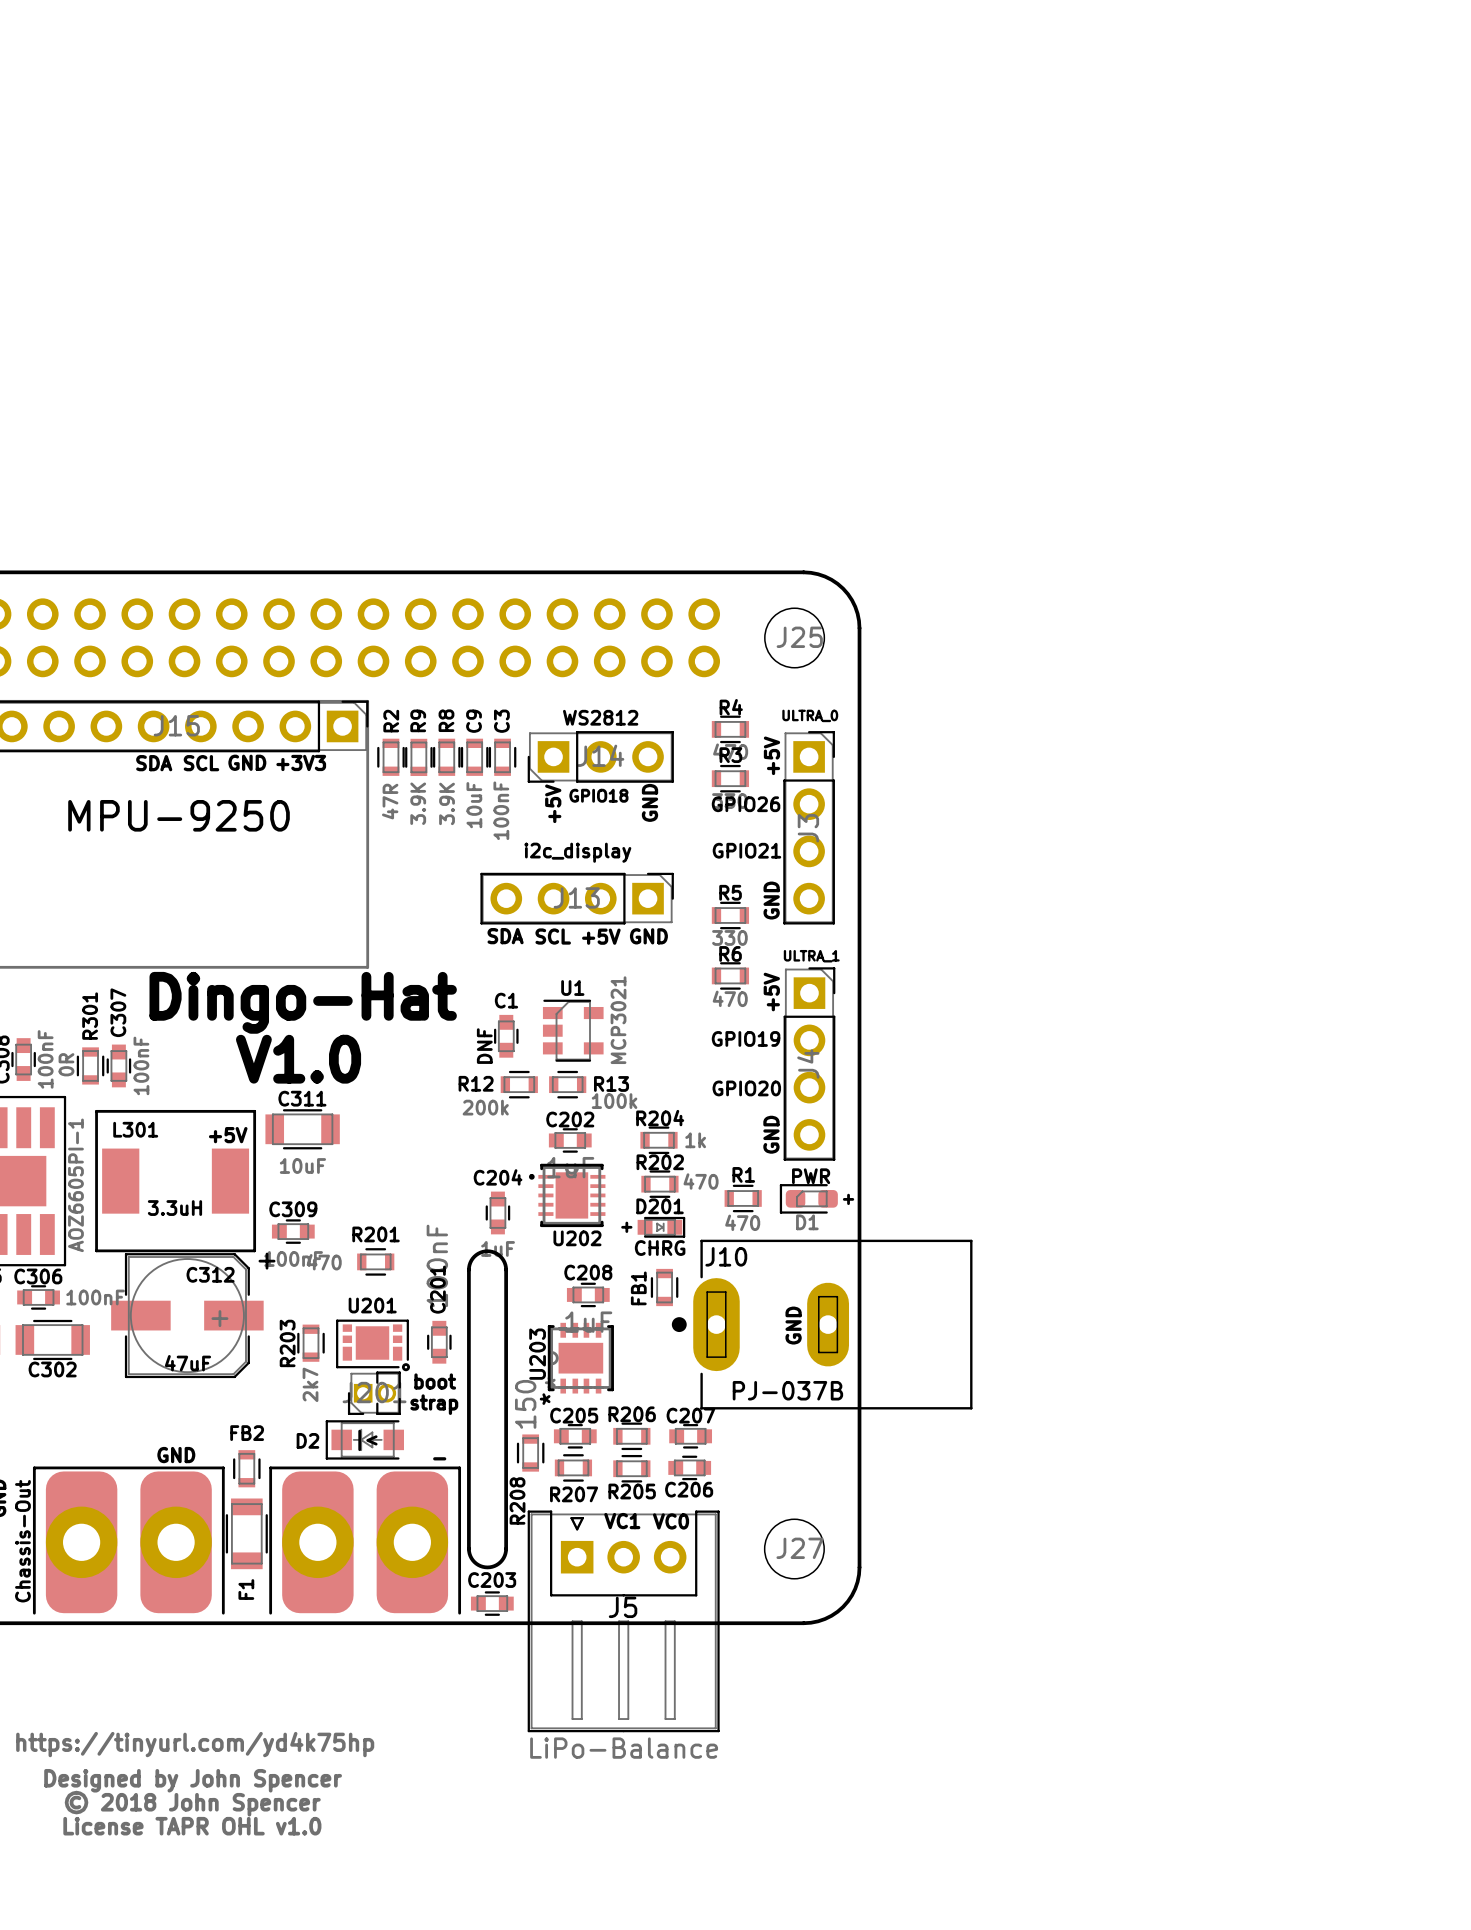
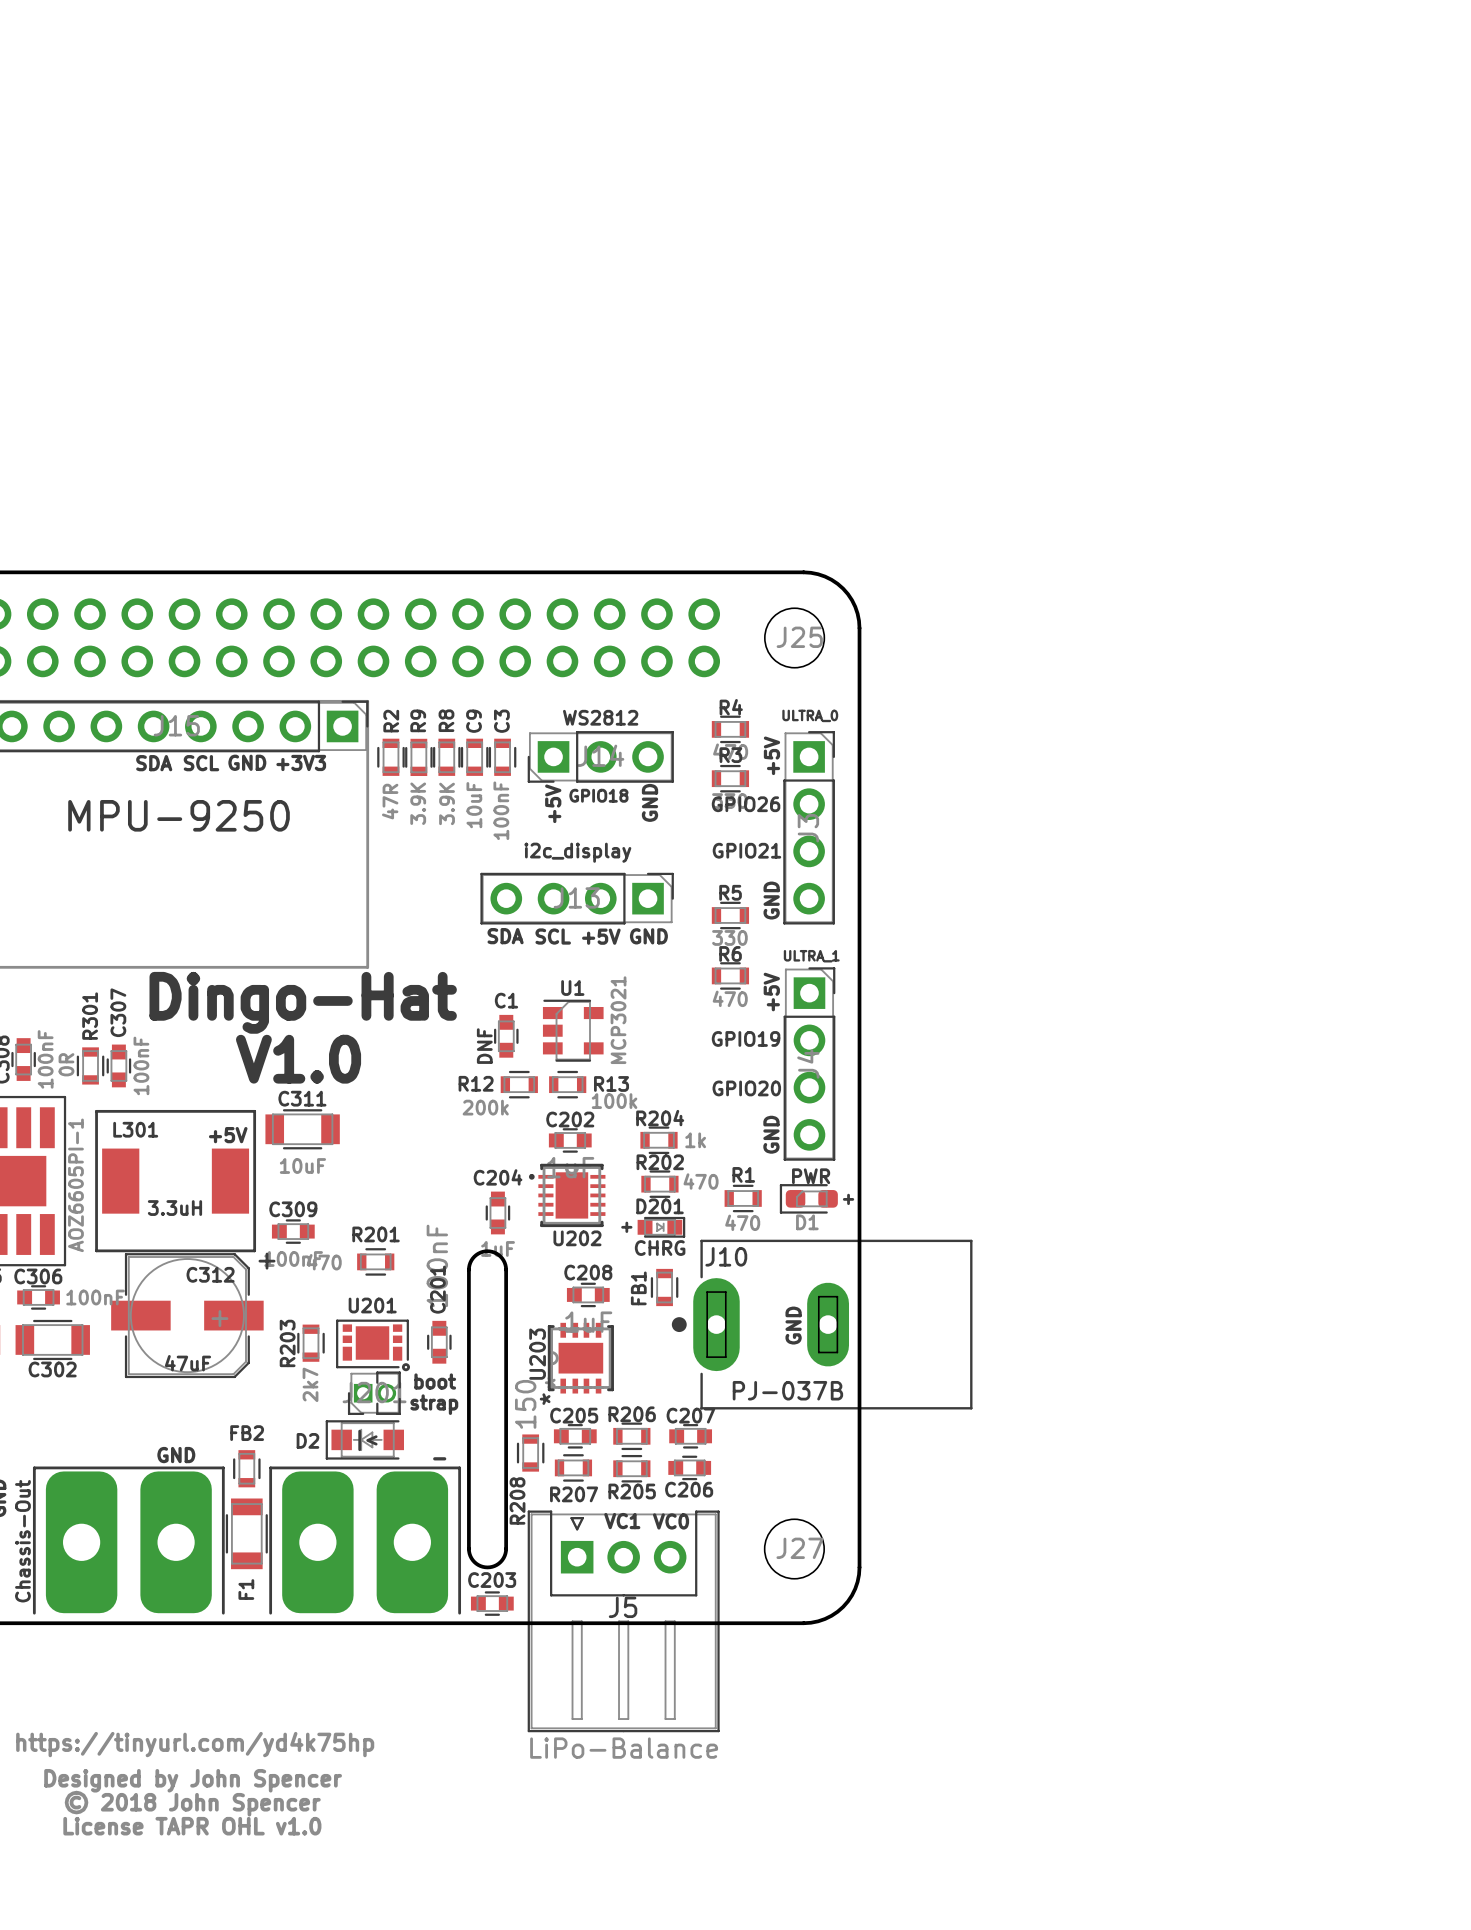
part footprint: [32, 1466, 225, 1615] -> [32, 1466, 225, 1615]
part footprint: [269, 1466, 462, 1615] -> [269, 1466, 462, 1615]

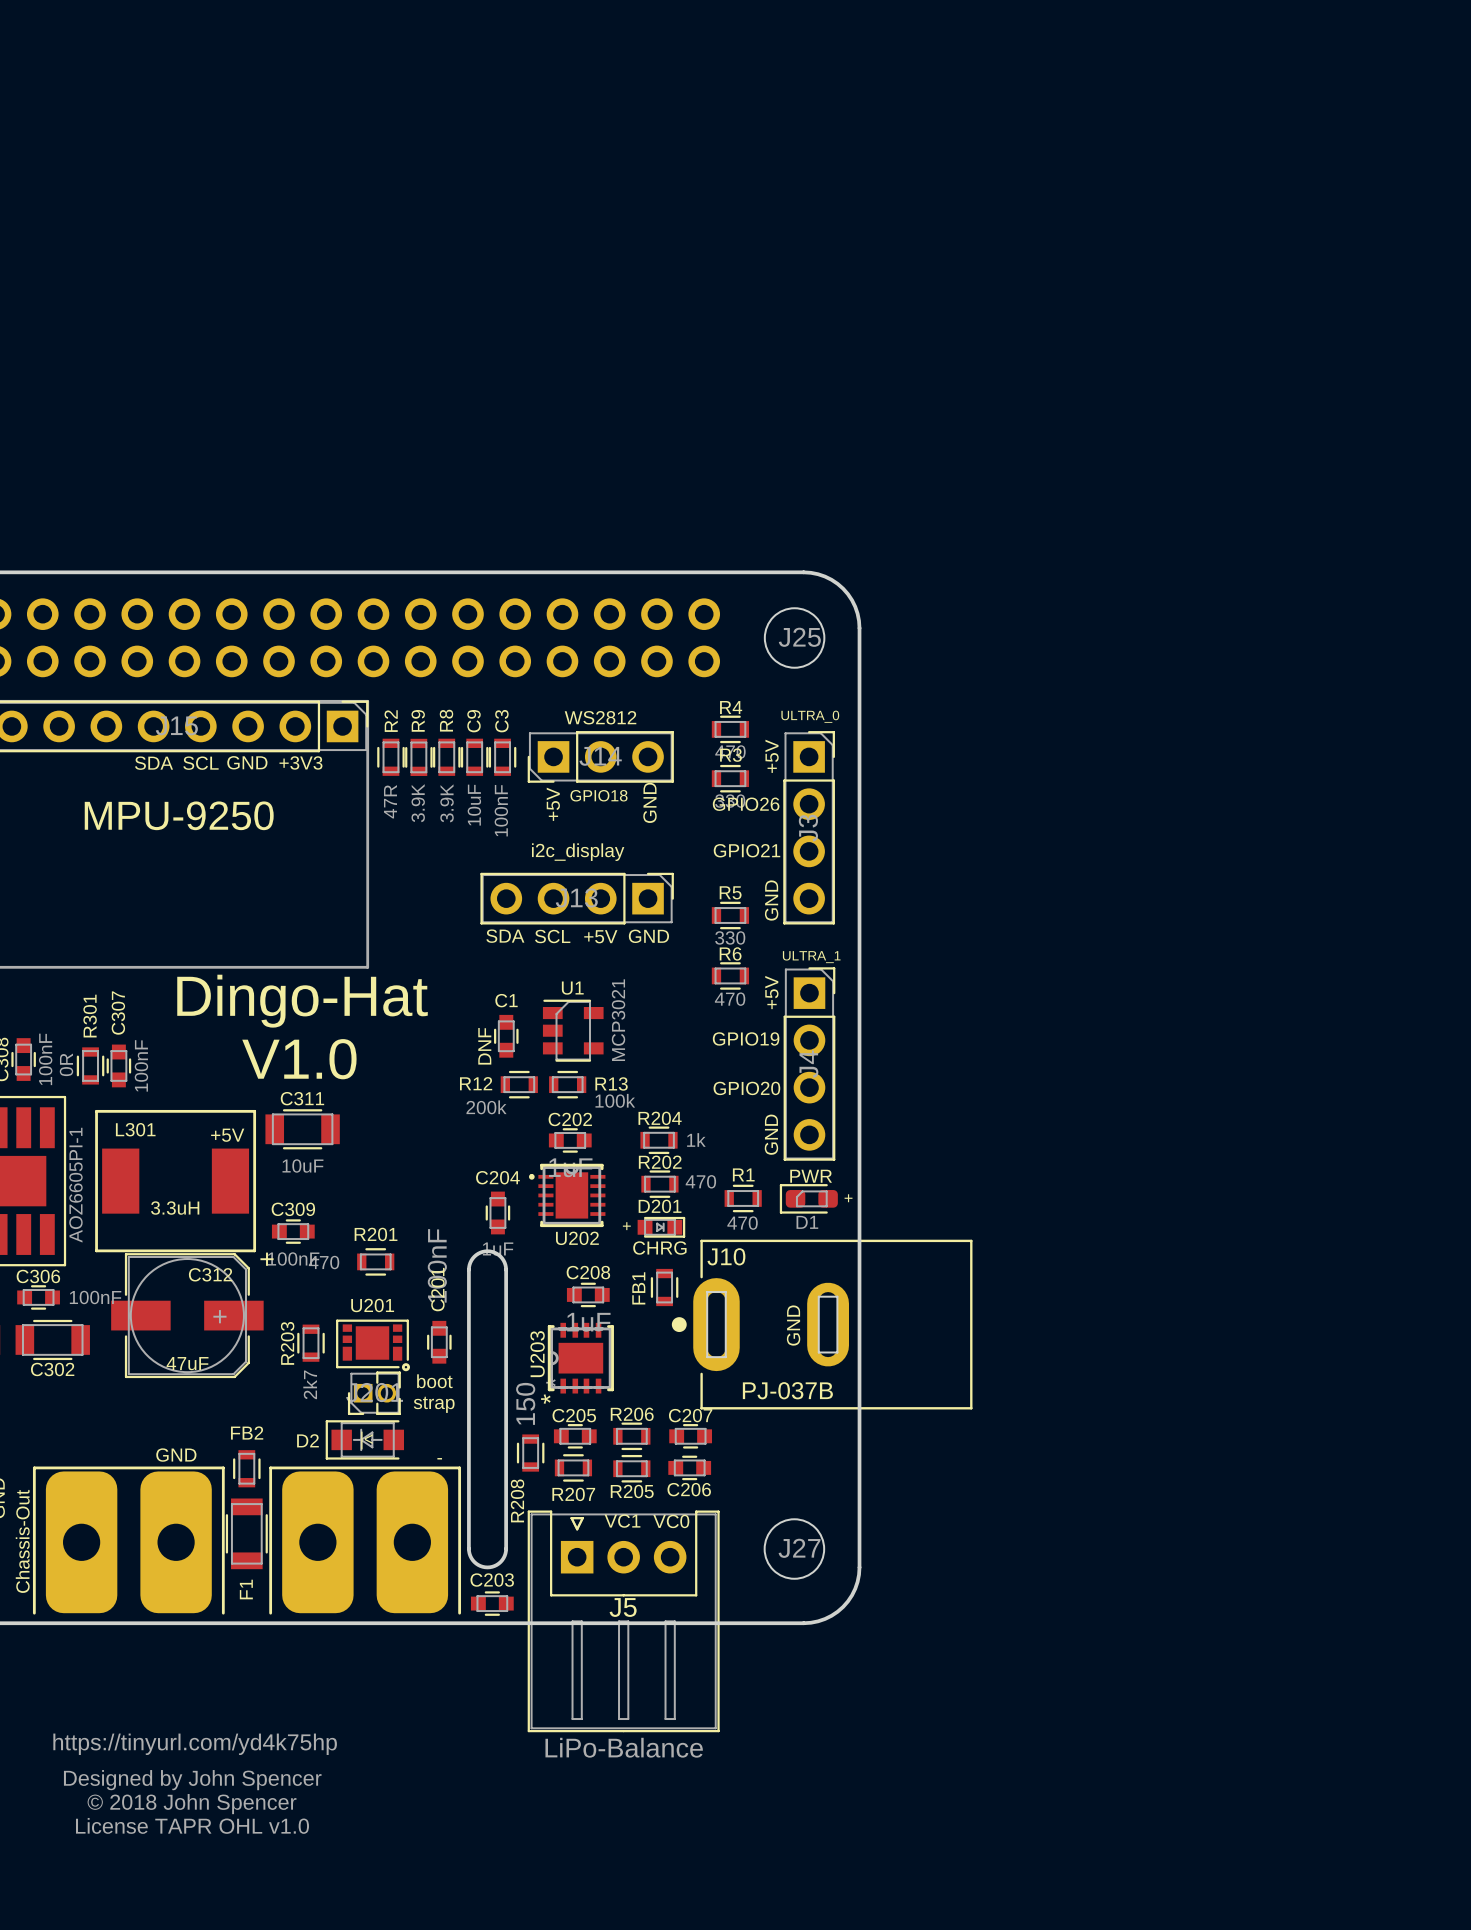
J10 footprint: [671, 1239, 973, 1410] -> [671, 1239, 973, 1410]

